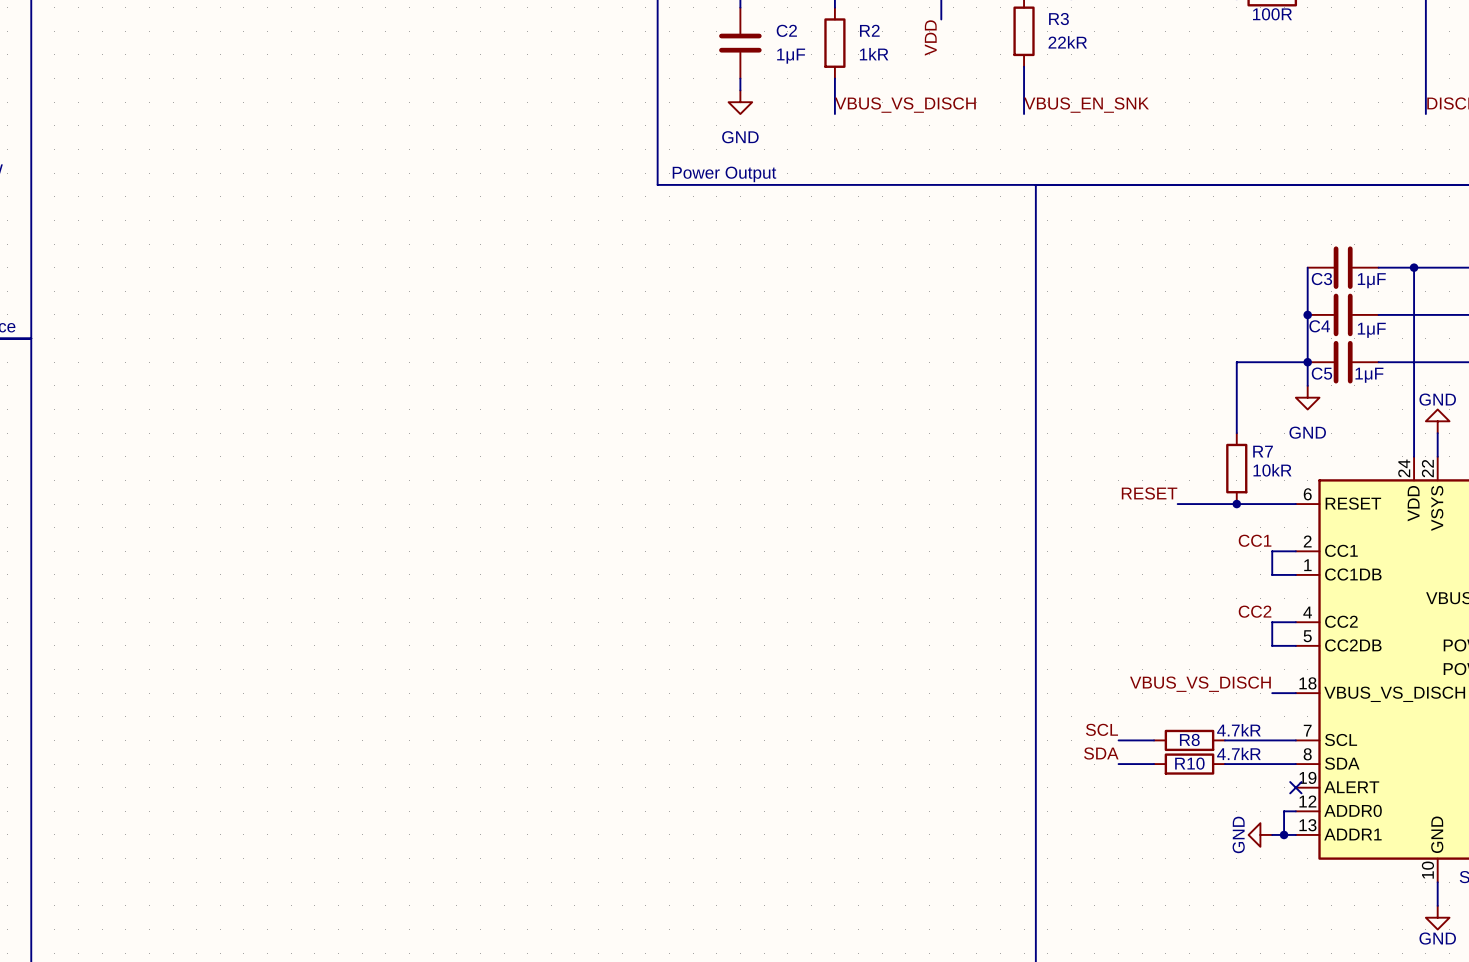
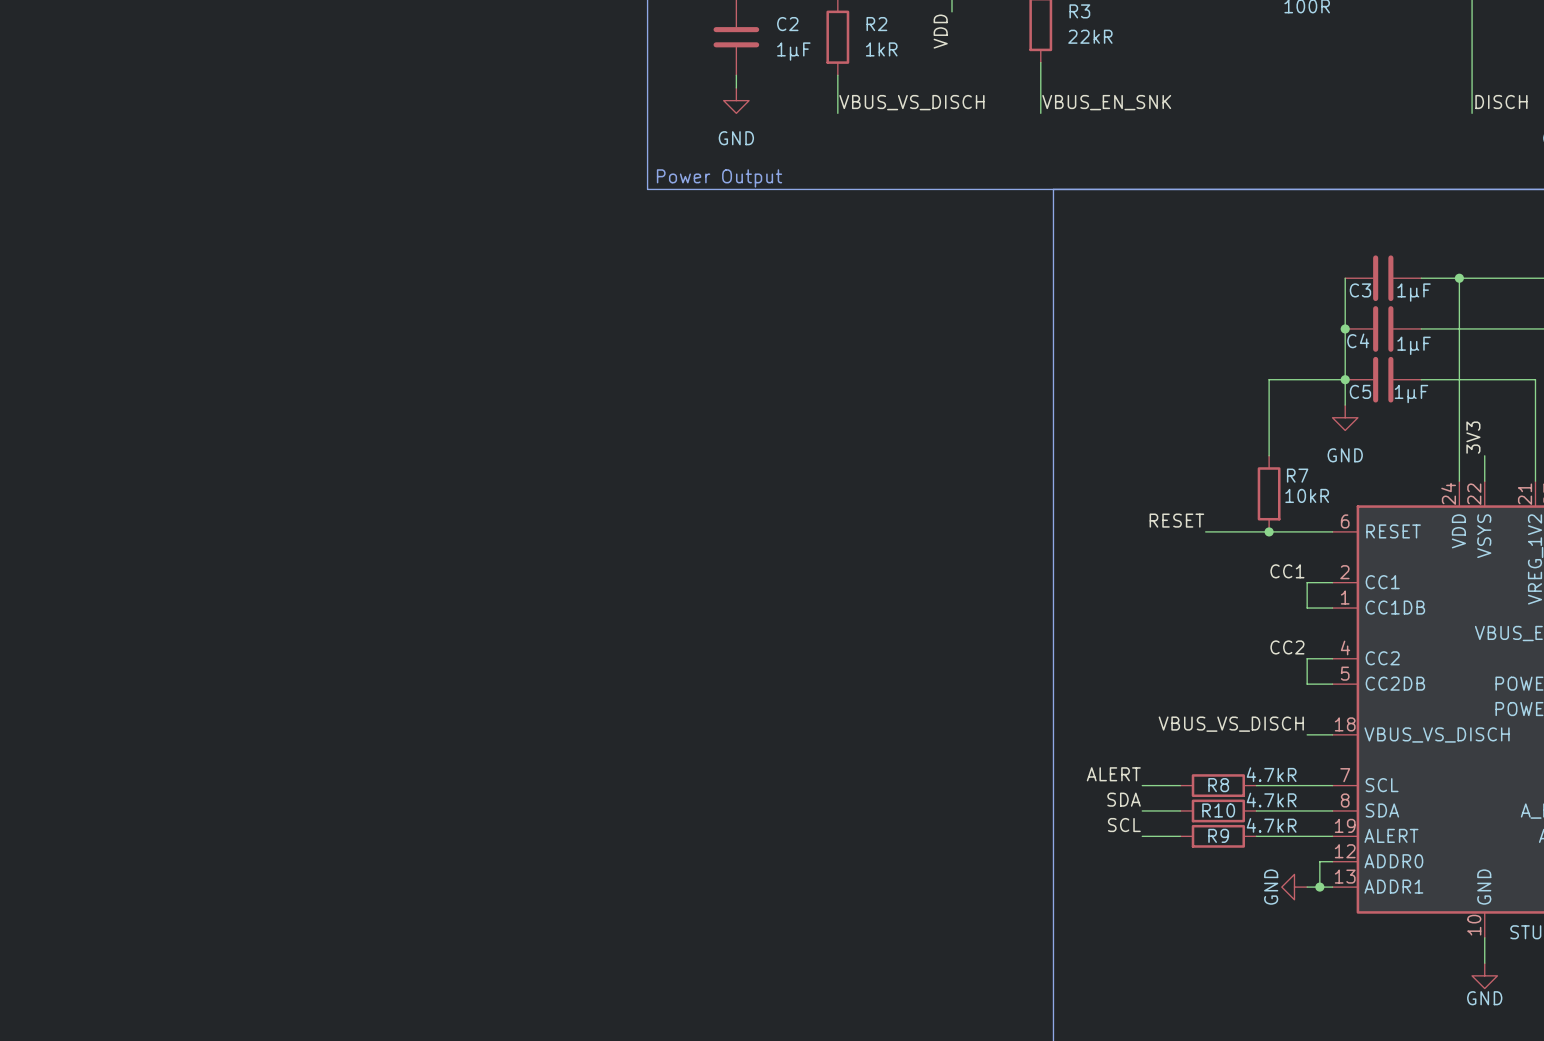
label: none -> 3V3 (1473, 437)
power symbol: GND (1437, 421) -> none
label: SCL (1101, 729) -> ALERT (1113, 774)
label: none -> SCL (1124, 825)
wire: none -> (1142, 836) (1180, 836)
R9: none -> 4.7kR (1218, 836)
wire: none -> (1256, 836) (1332, 836)
no-connect mark: (1295, 787) -> none

